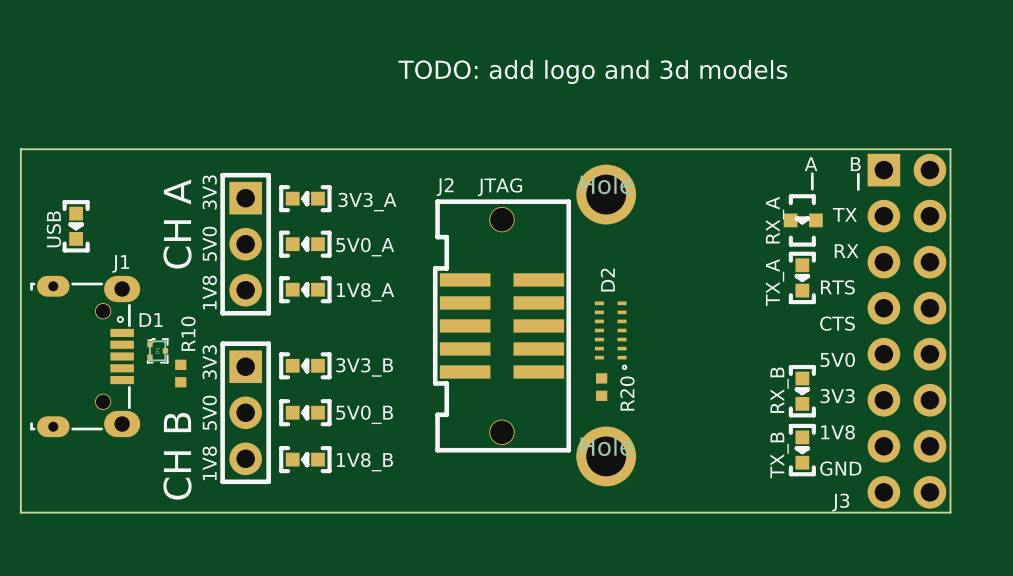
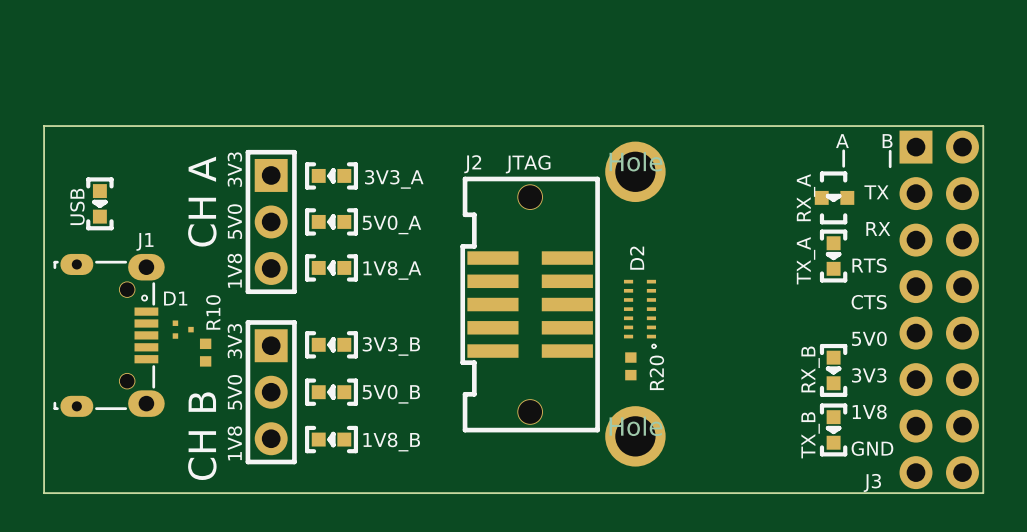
text: TODO: add logo and 3d models (592, 71) -> none
part: (157, 350) -> none
part: none -> (183, 329)

